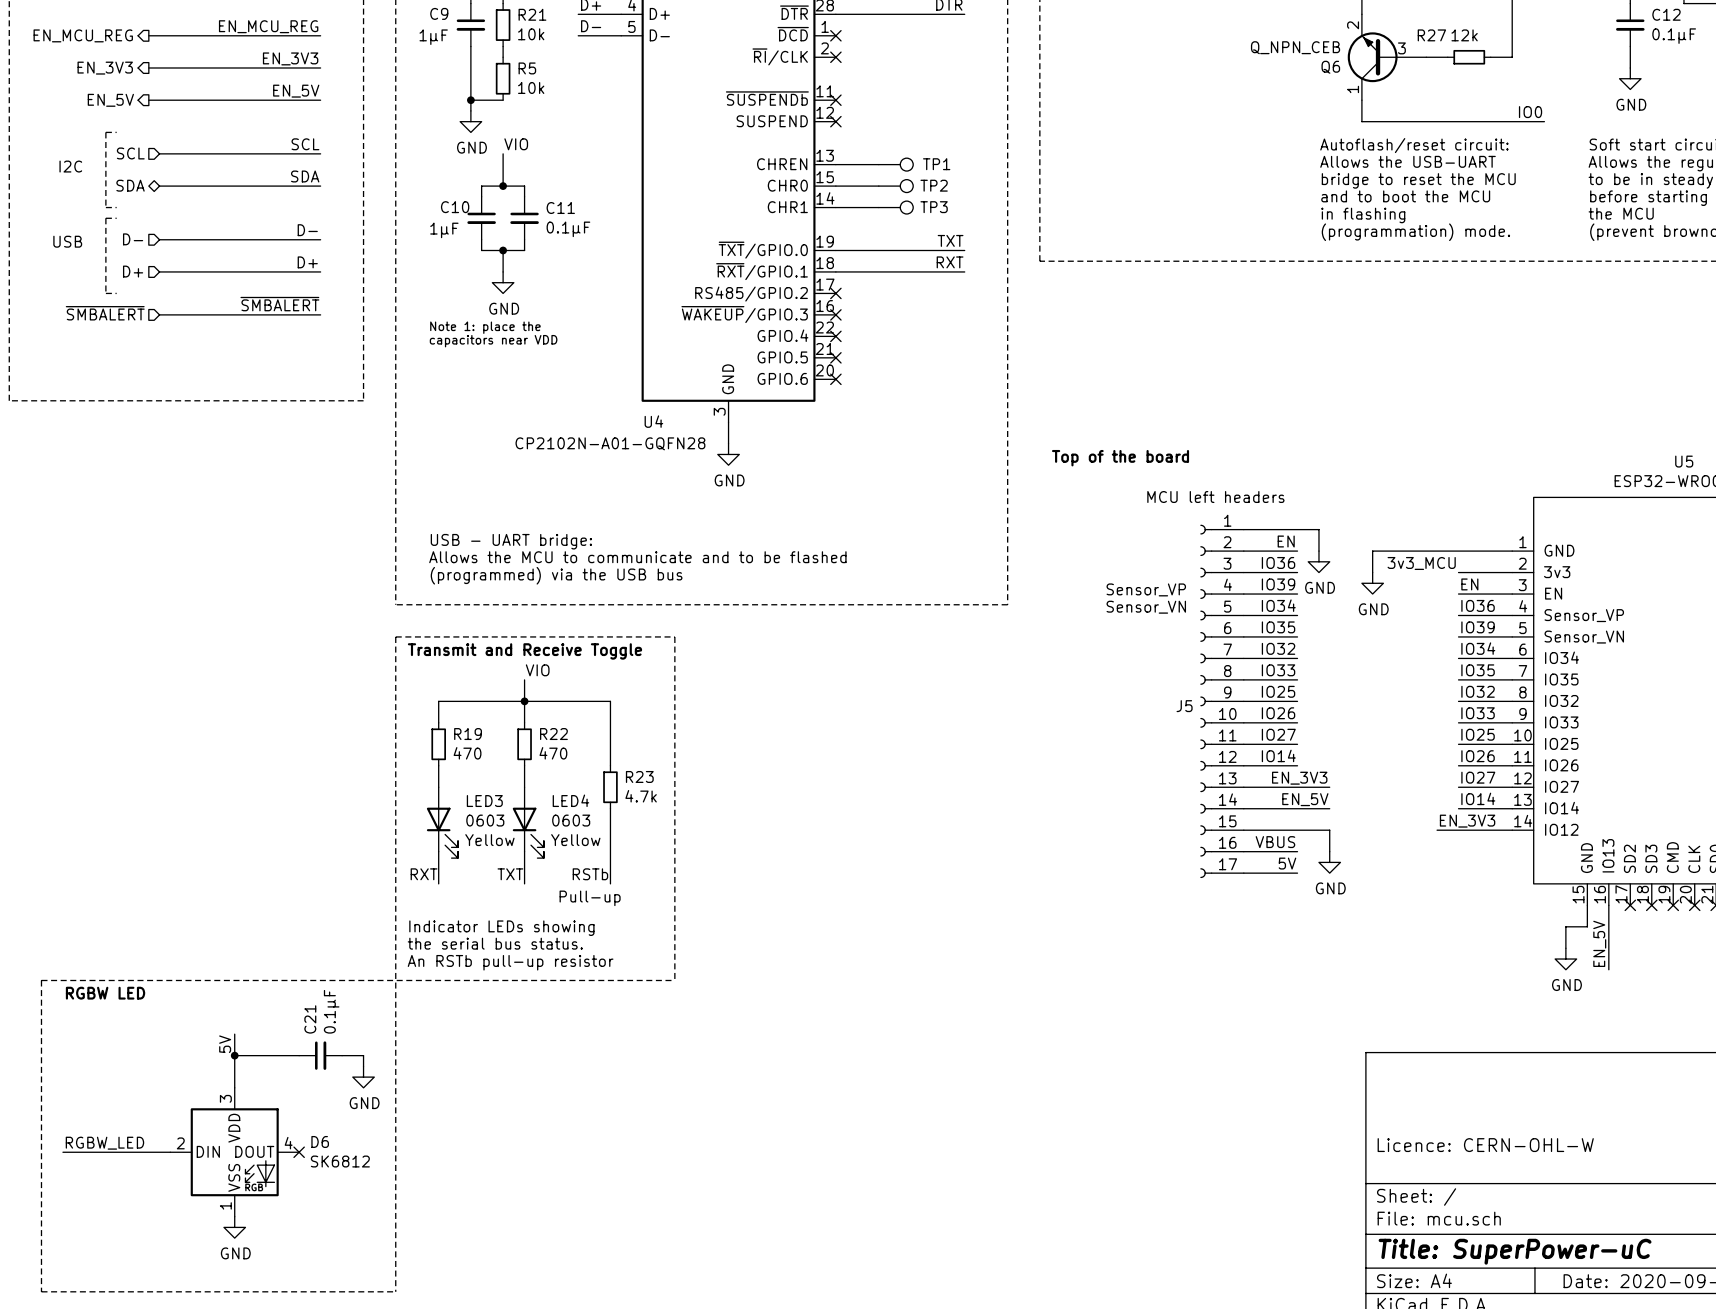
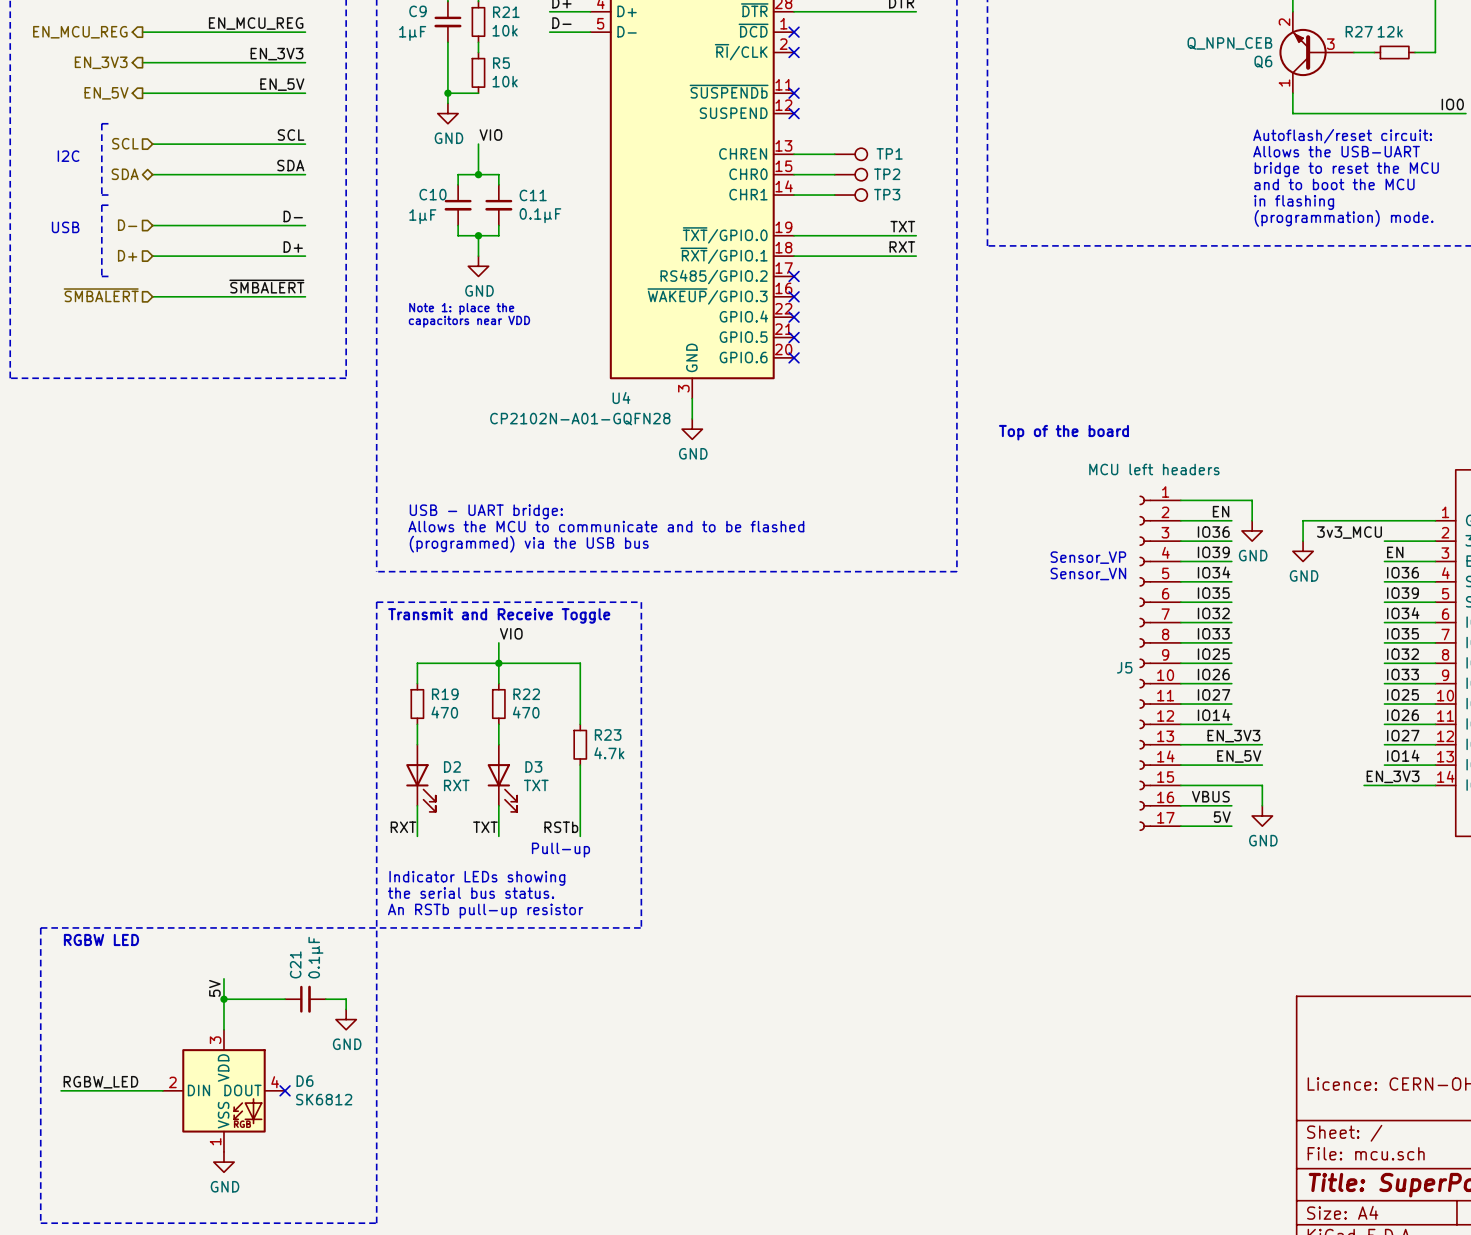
LED4 name: LED4 (570, 800) -> D3 (533, 766)
LED3 name: LED3 (484, 801) -> D2 (452, 766)
LED3 text: 0603 (485, 820) -> none
LED4 text: 0603 (571, 820) -> none
LED3 value: none -> RXT (456, 785)
LED4 value: none -> TXT (536, 785)
LED3 text: Yellow (489, 840) -> none
LED4 text: Yellow (575, 840) -> none

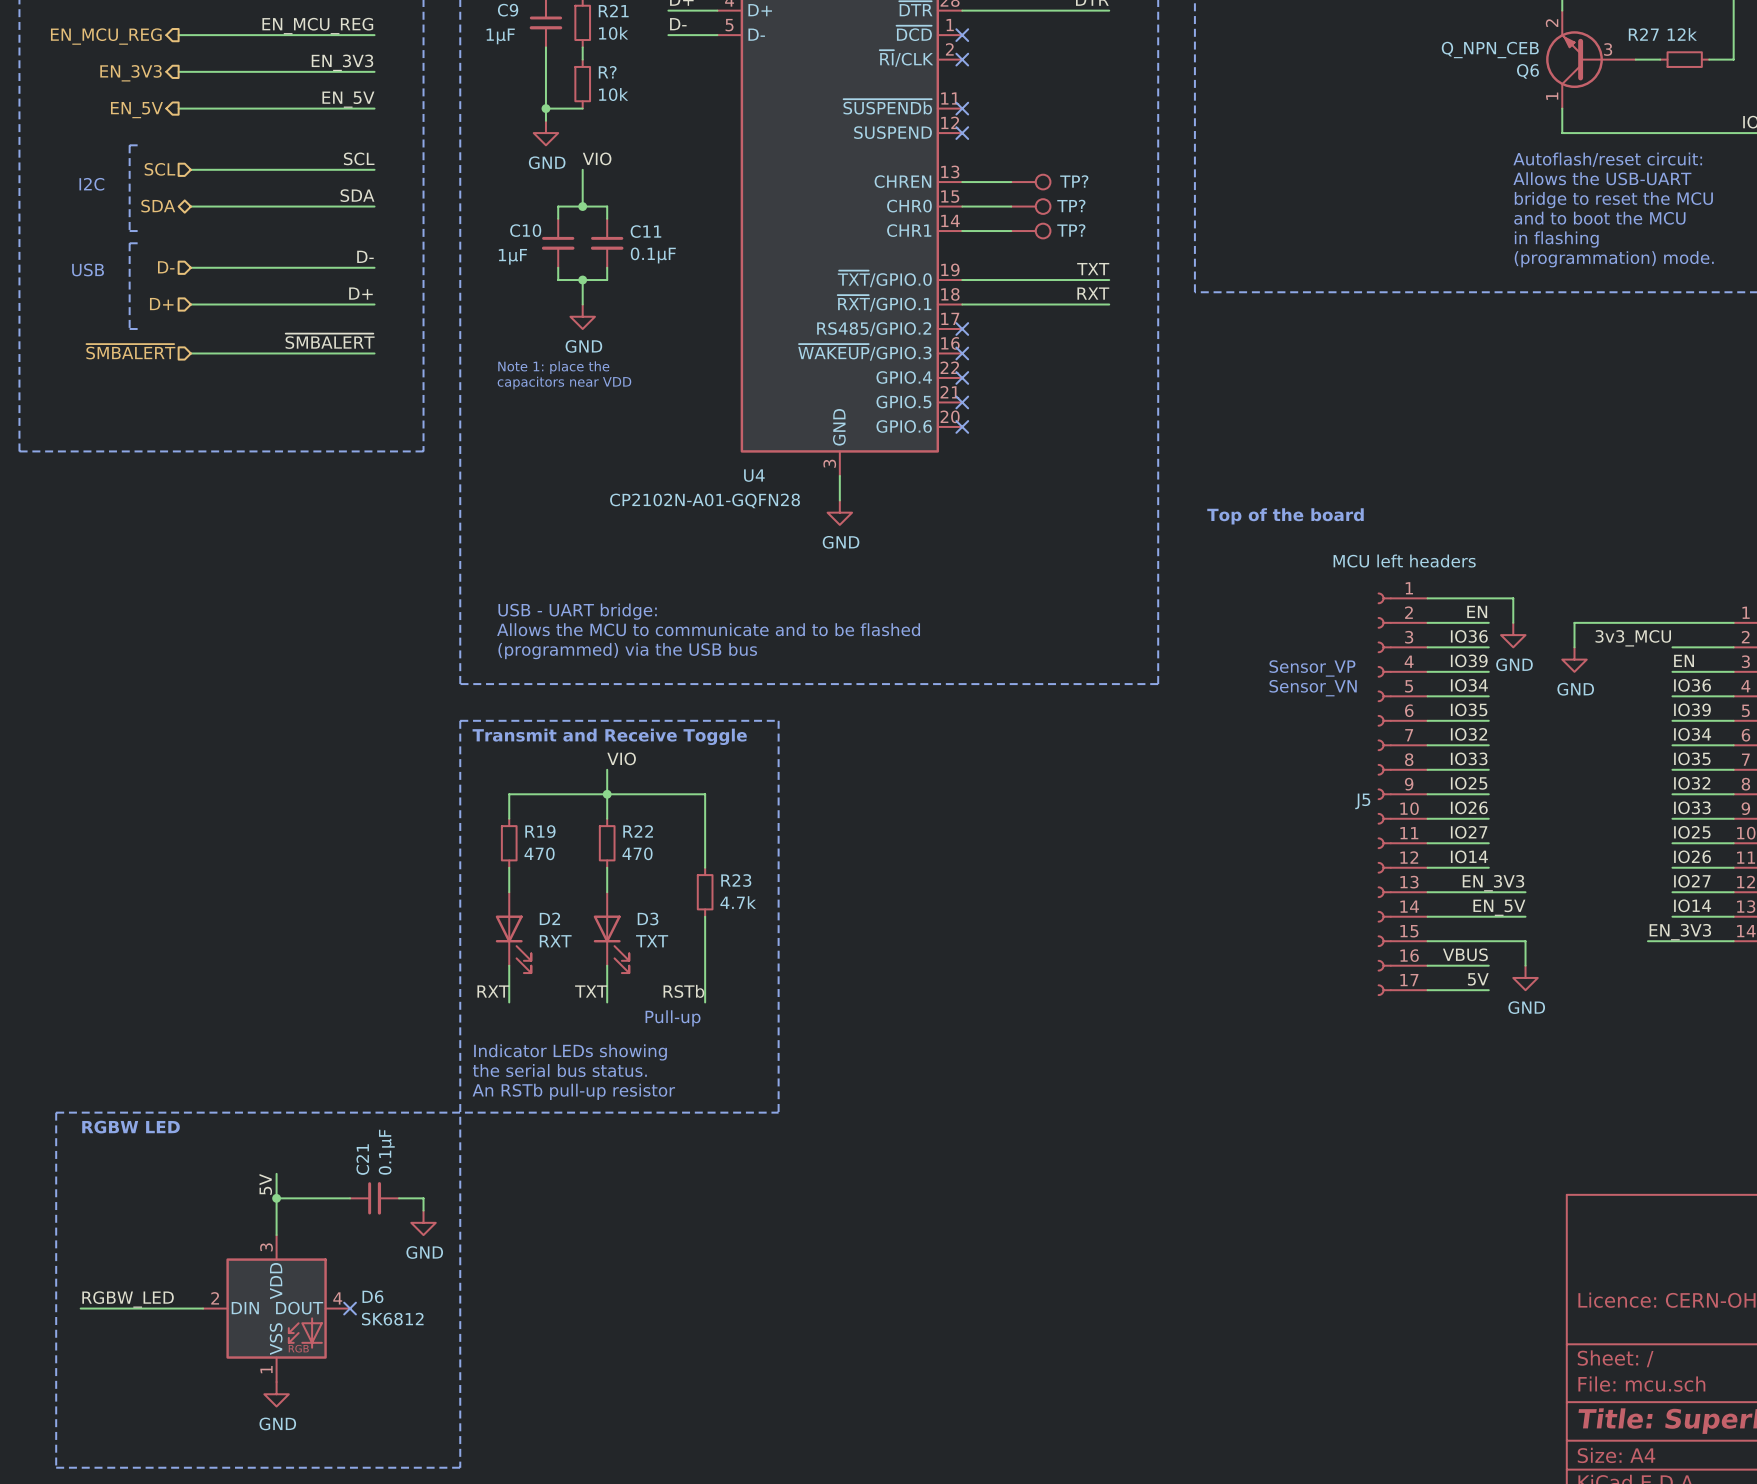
R5 name: R5 (501, 63) -> R? (607, 72)
TP1 name: TP1 (889, 153) -> TP? (1074, 181)
TP2 name: TP2 (887, 174) -> TP? (1071, 205)
TP3 name: TP3 (887, 194) -> TP? (1071, 230)

